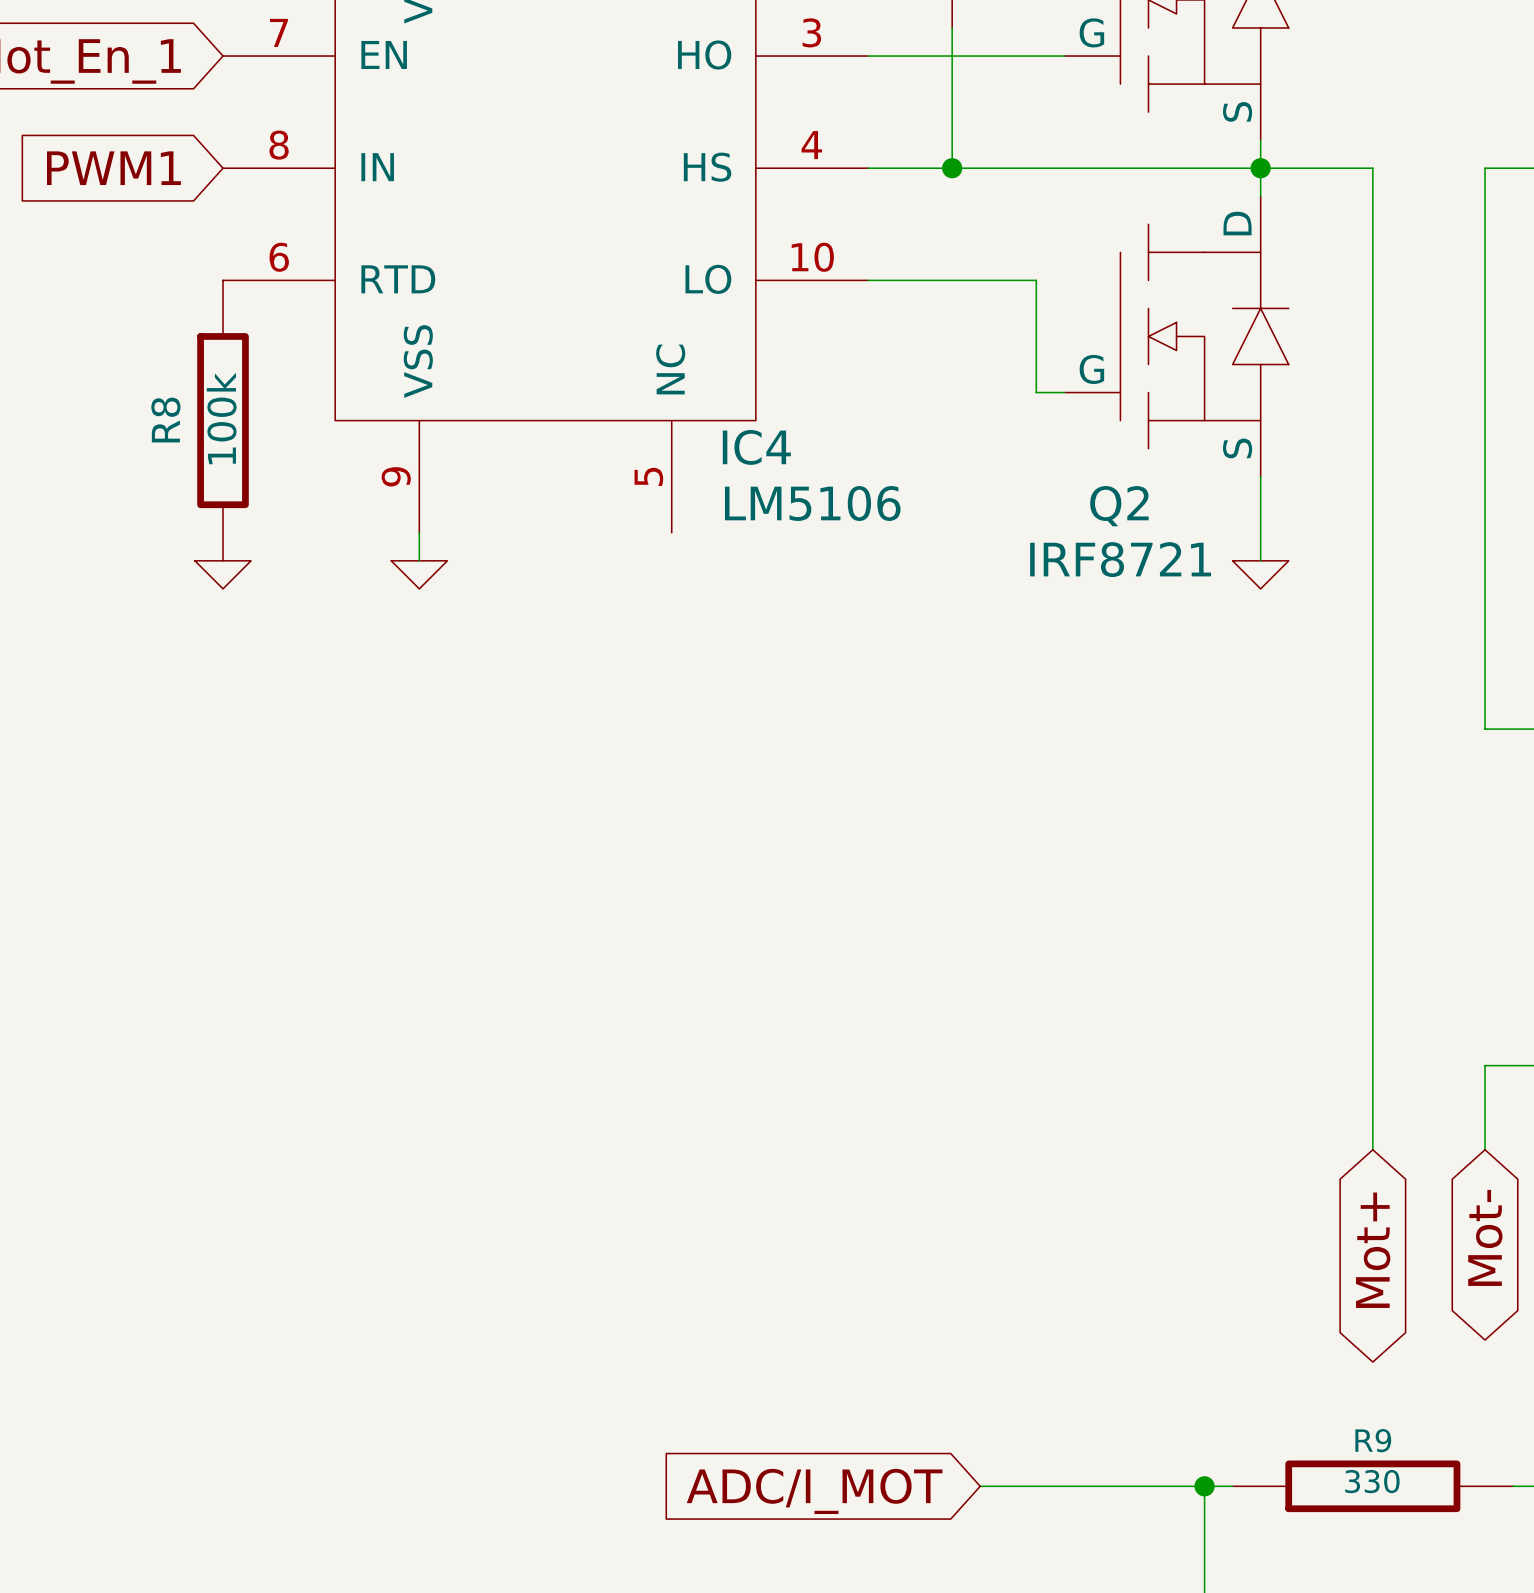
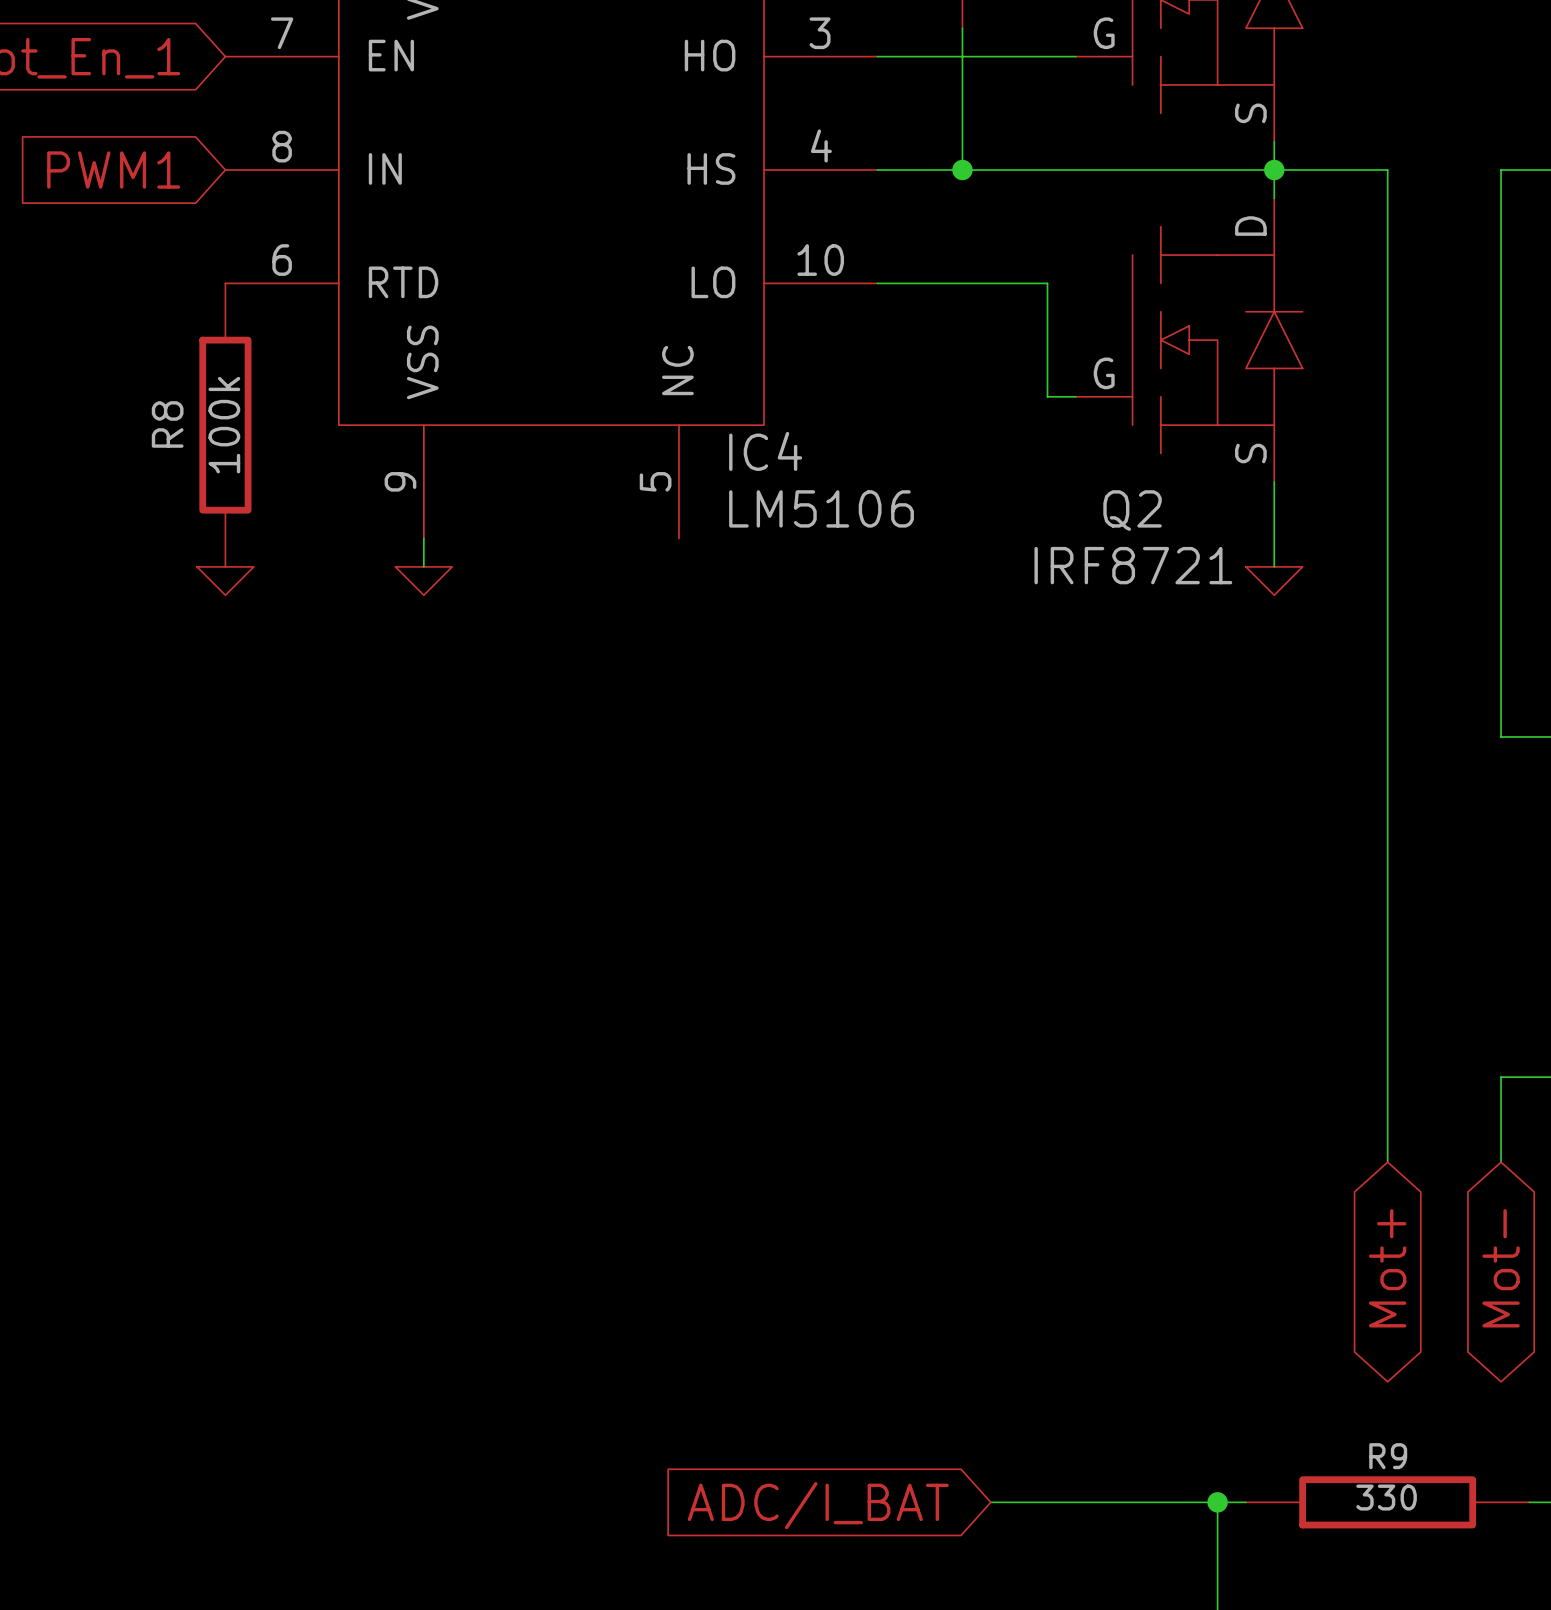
global label: ADC/I_MOT (814, 1491) -> ADC/I_BAT (818, 1505)

